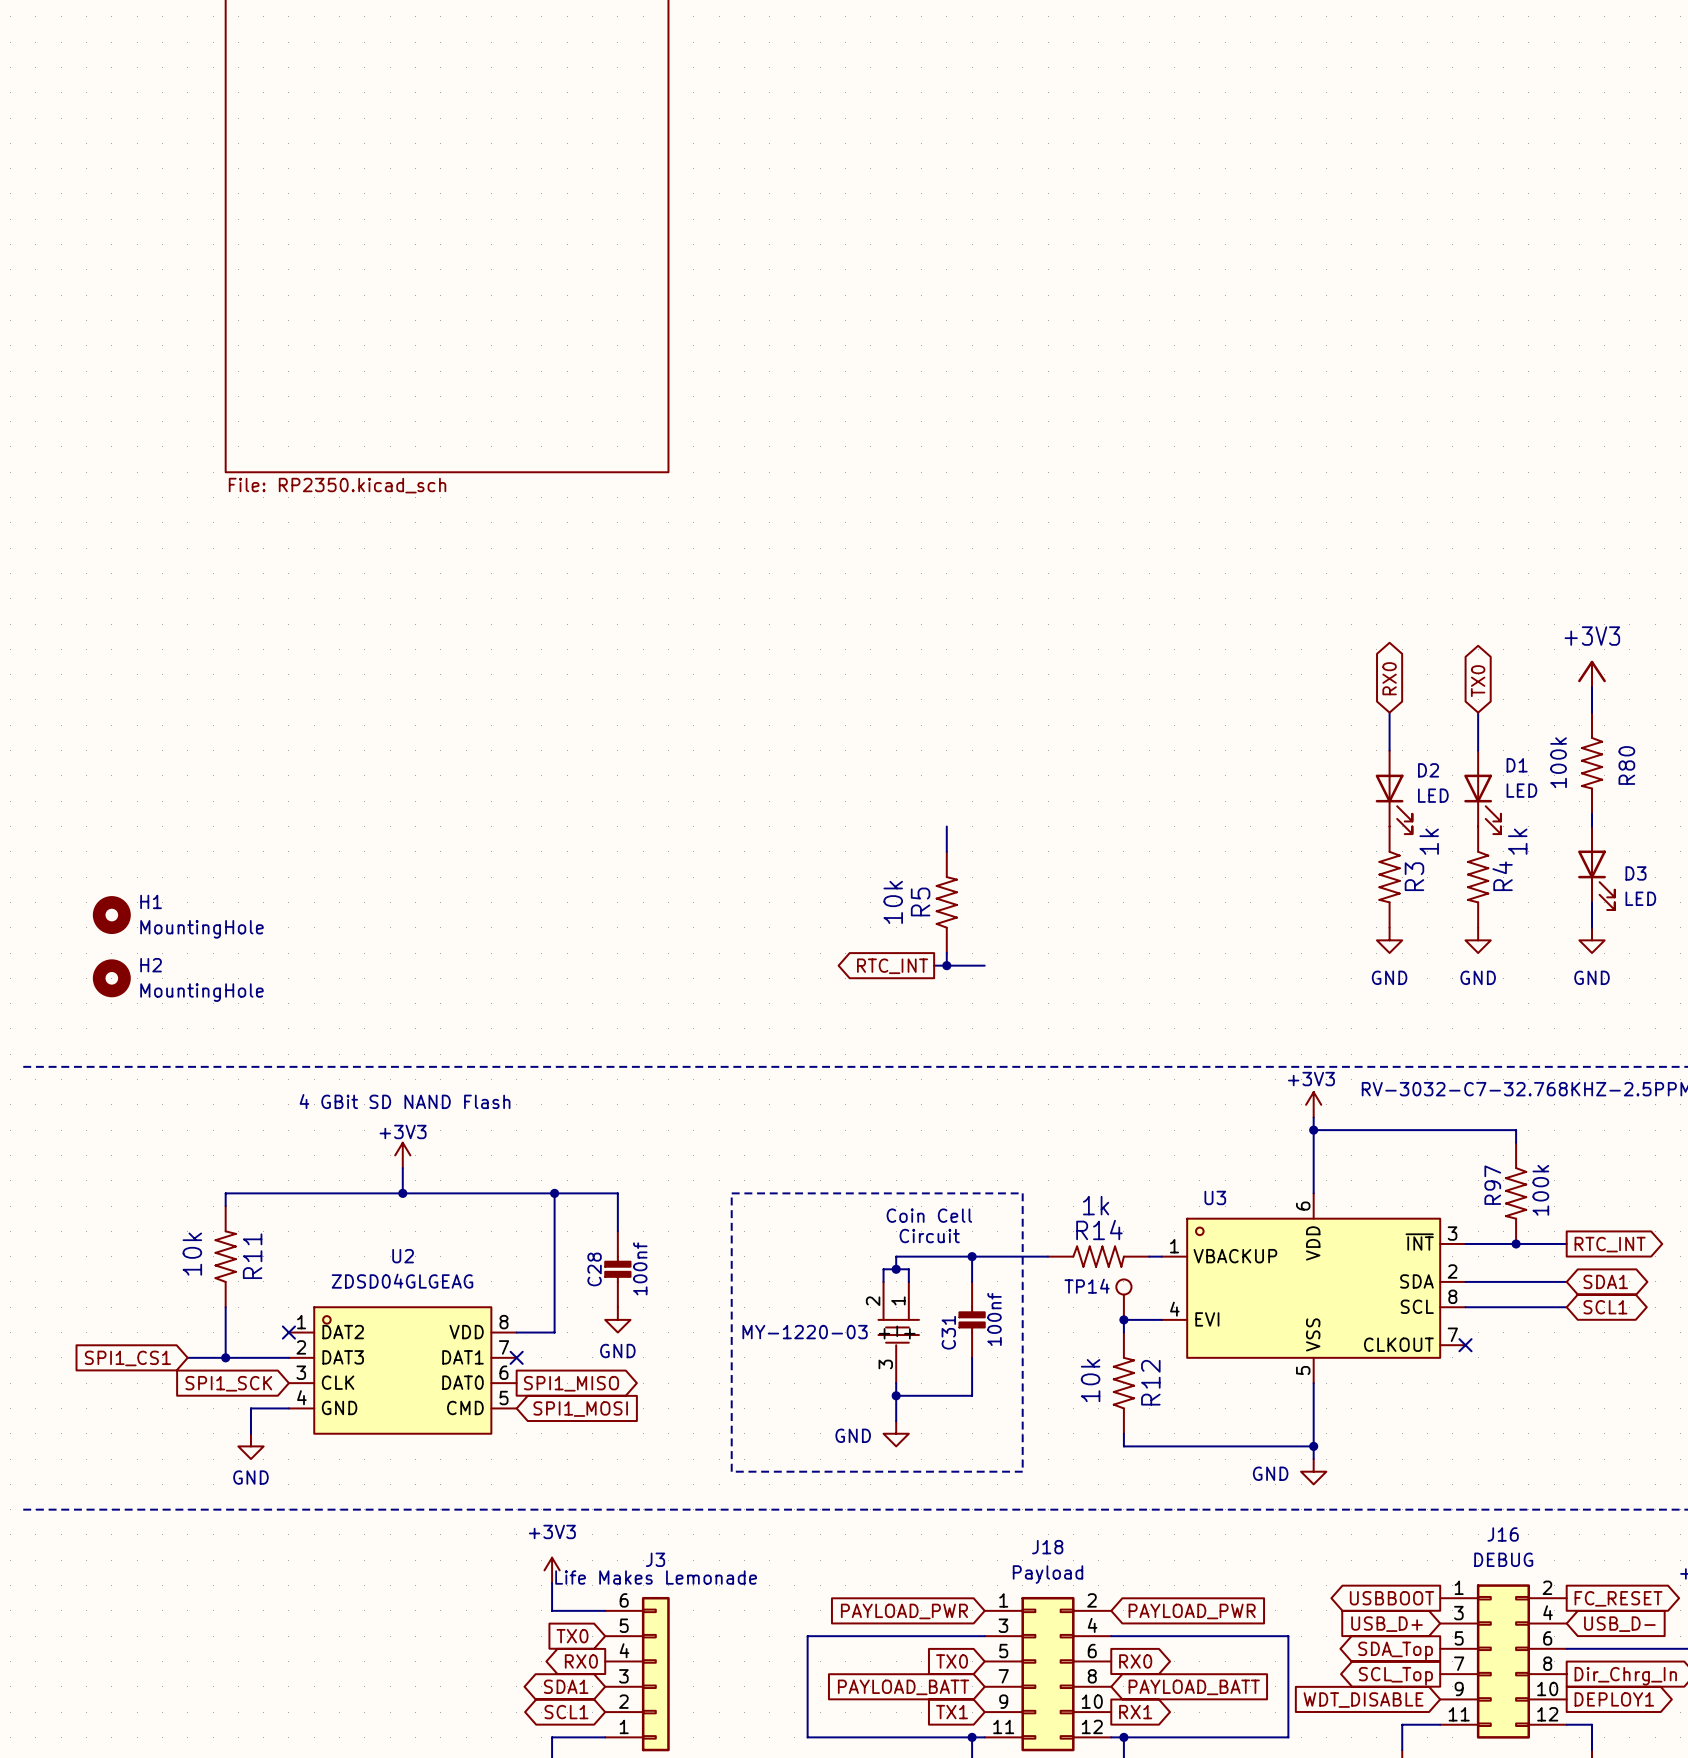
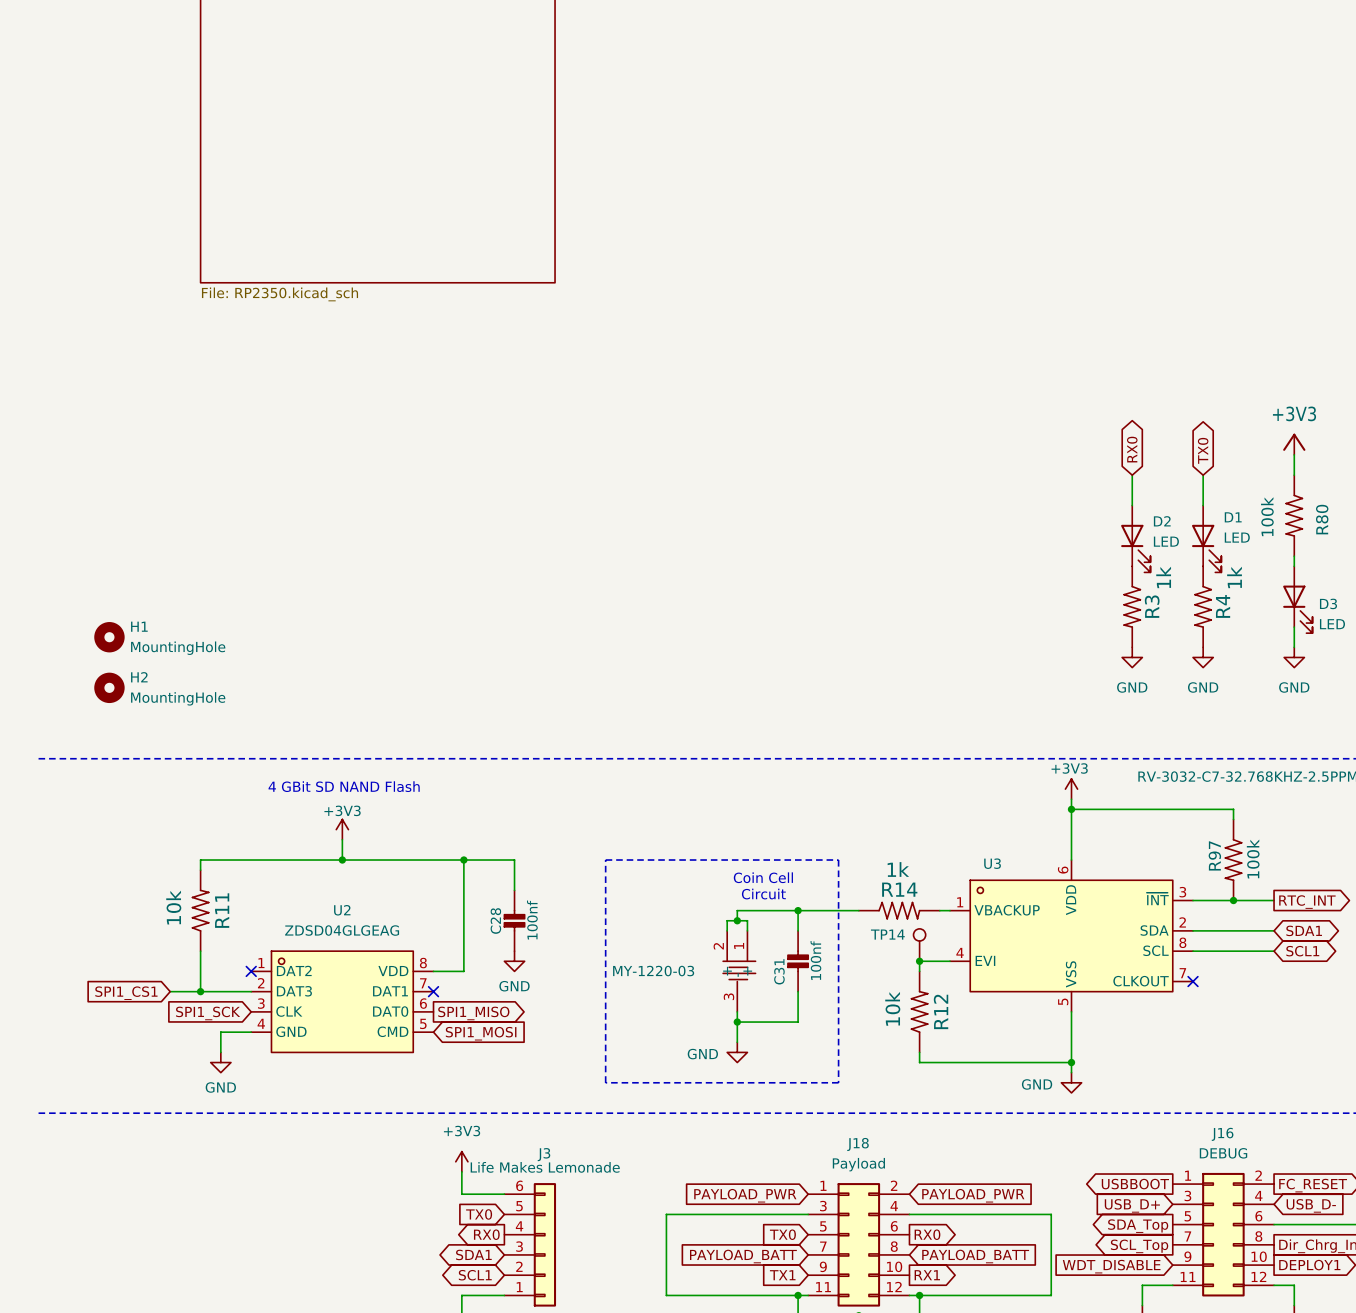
wire: (946, 826) (946, 851) -> none
R5: 10k (946, 902) -> none
wire: (946, 953) (946, 965) -> none
wire: (934, 965) (984, 965) -> none
junction: (946, 965) -> none
global label: RTC_INT (892, 966) -> none

